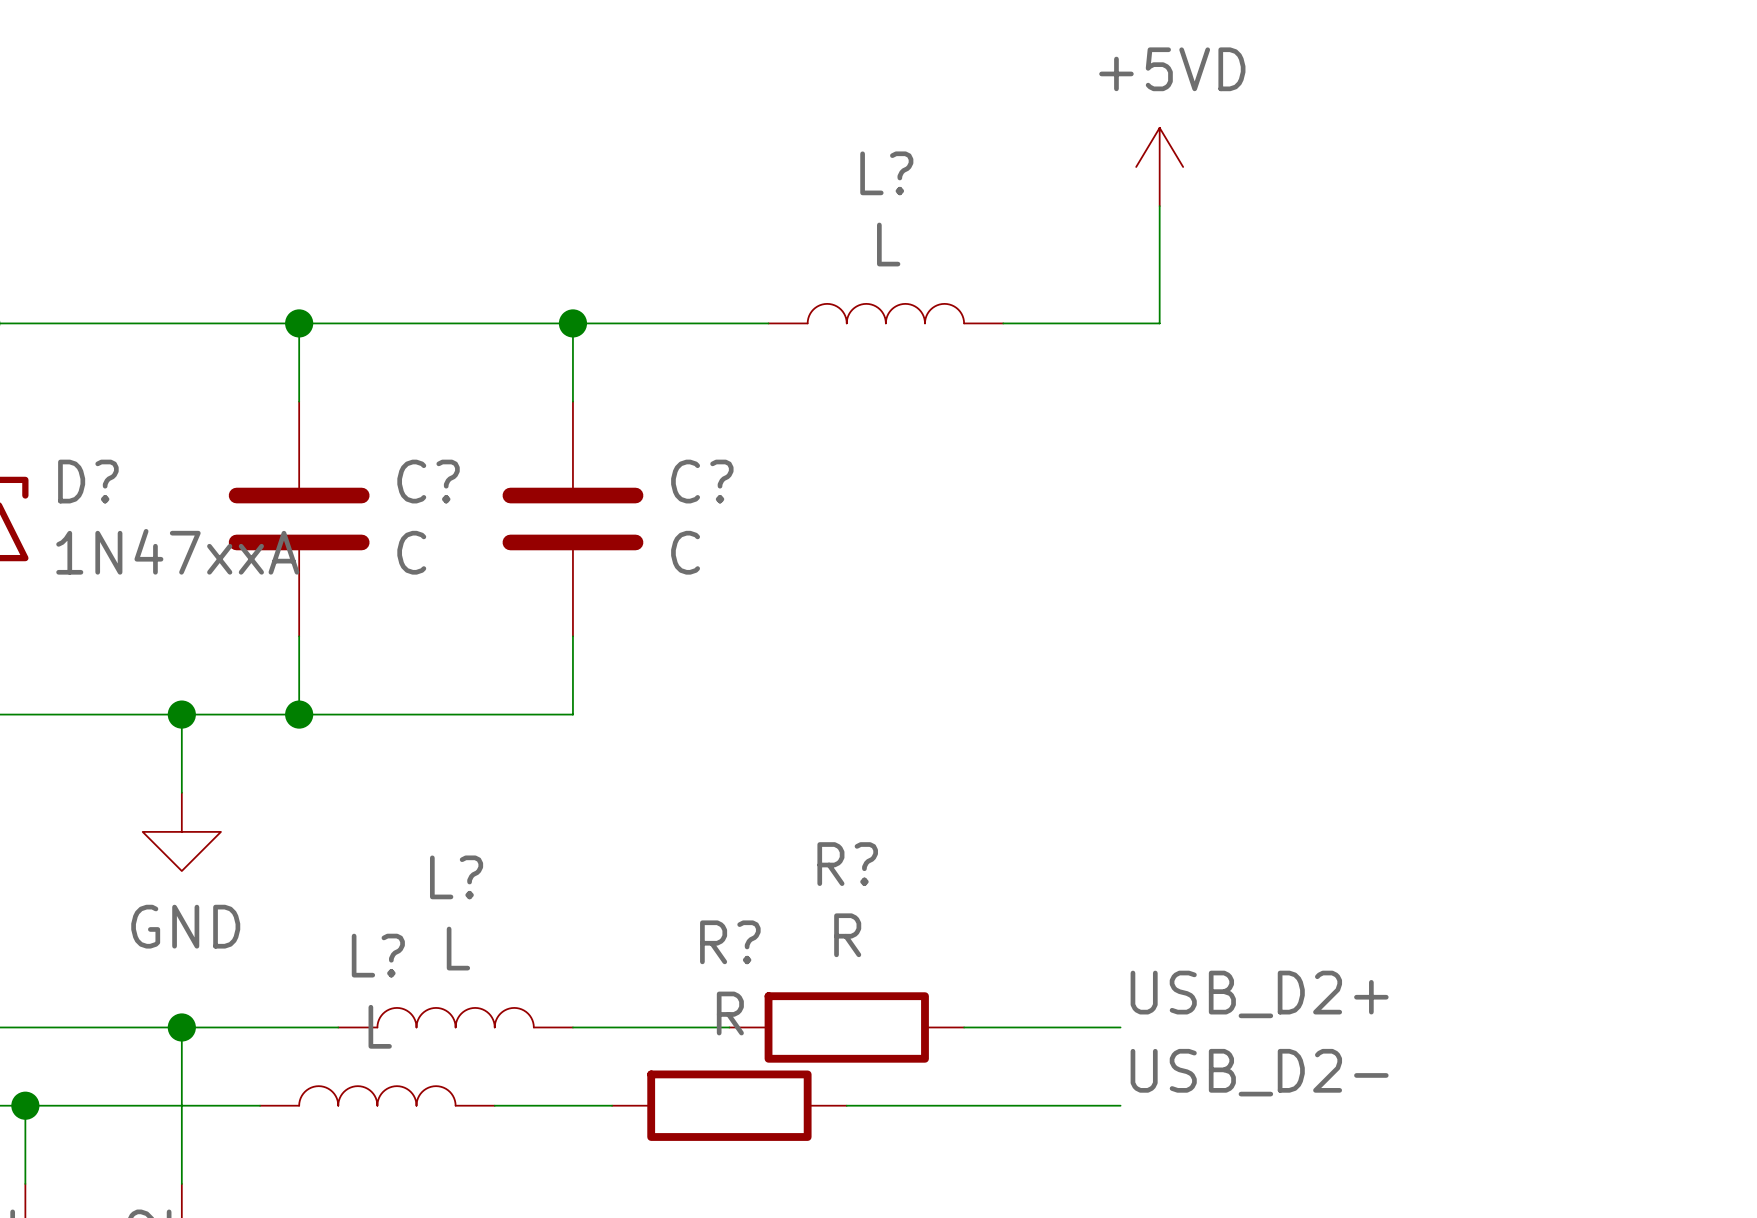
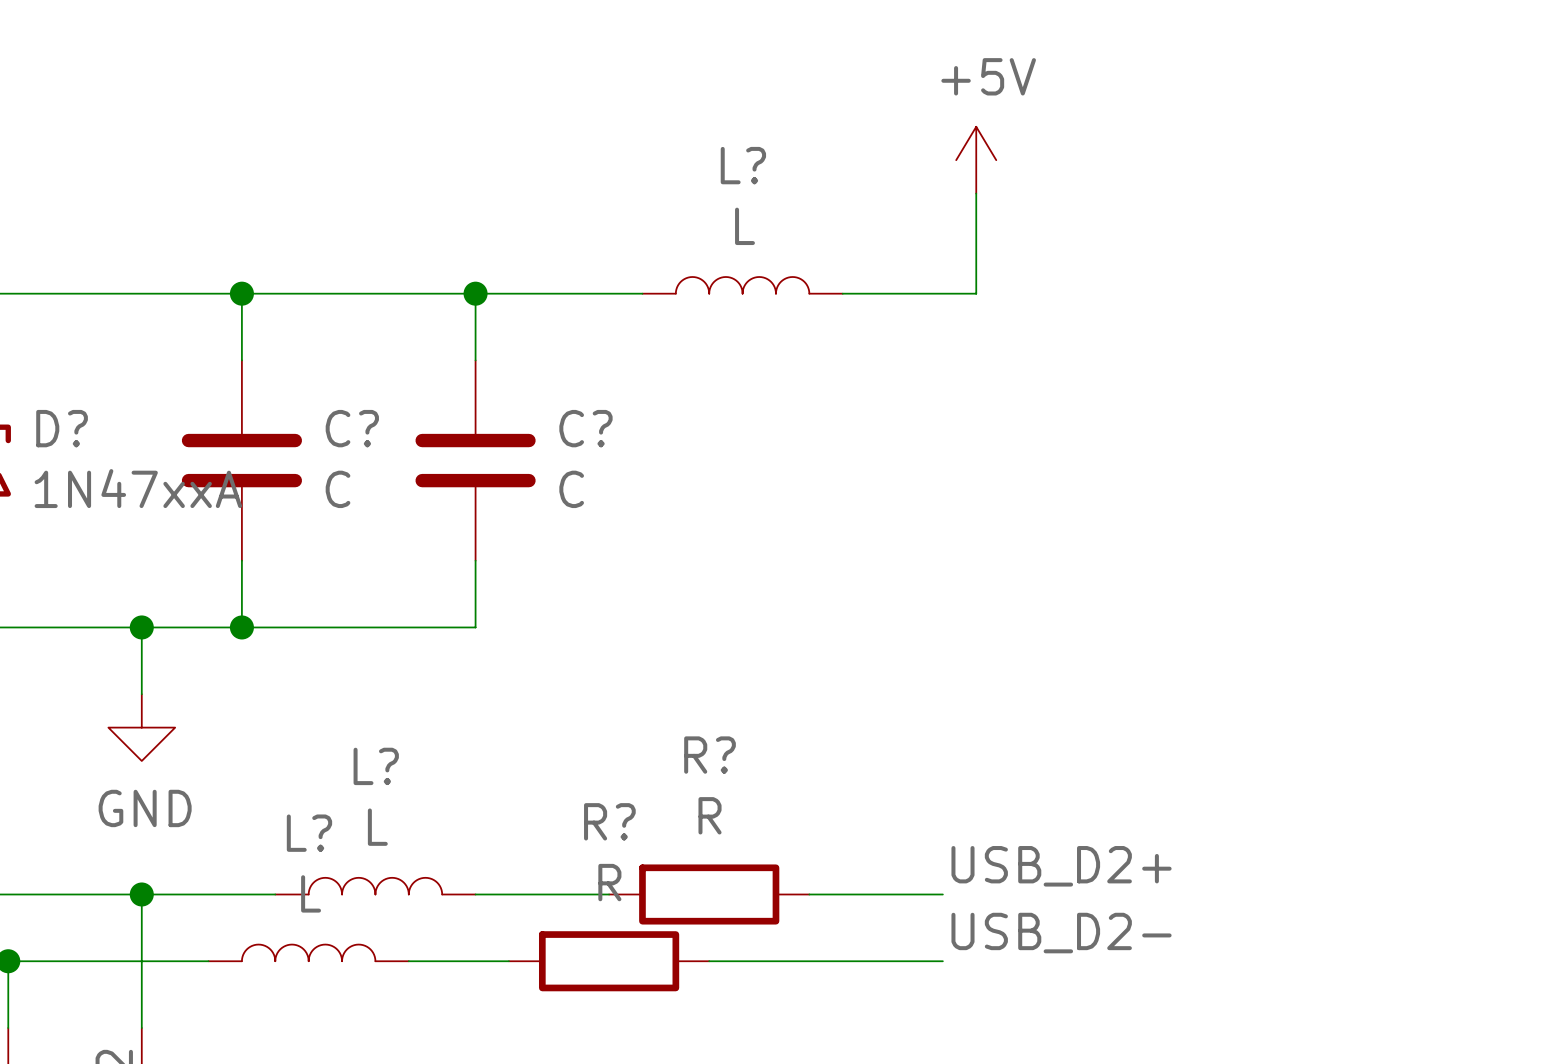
power symbol: +5VD (1159, 166) -> +5V (976, 160)

